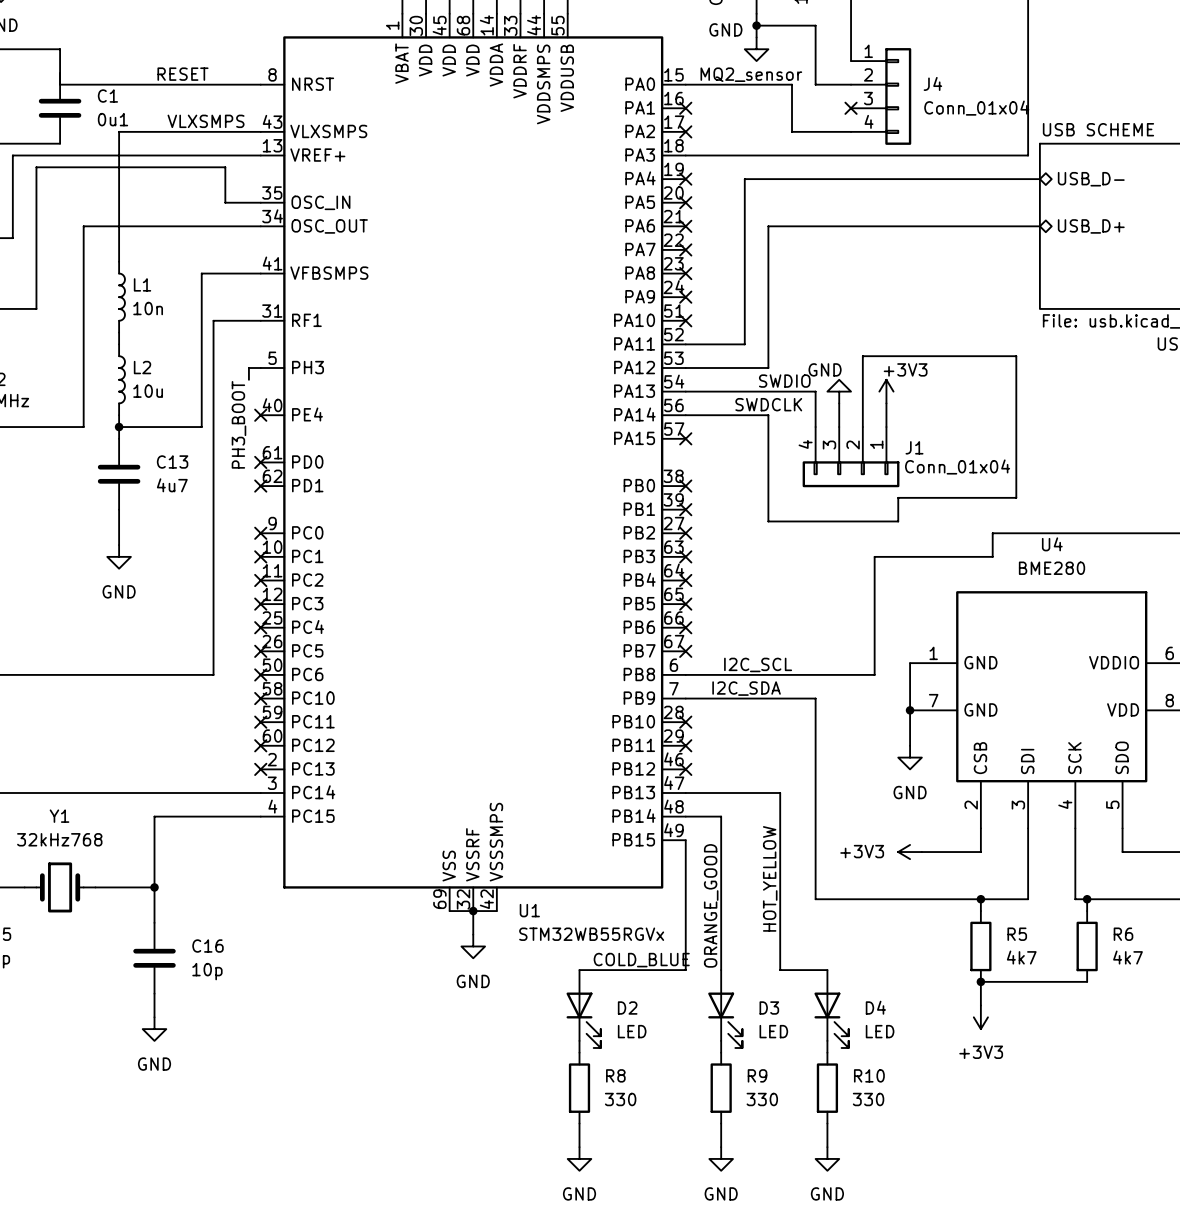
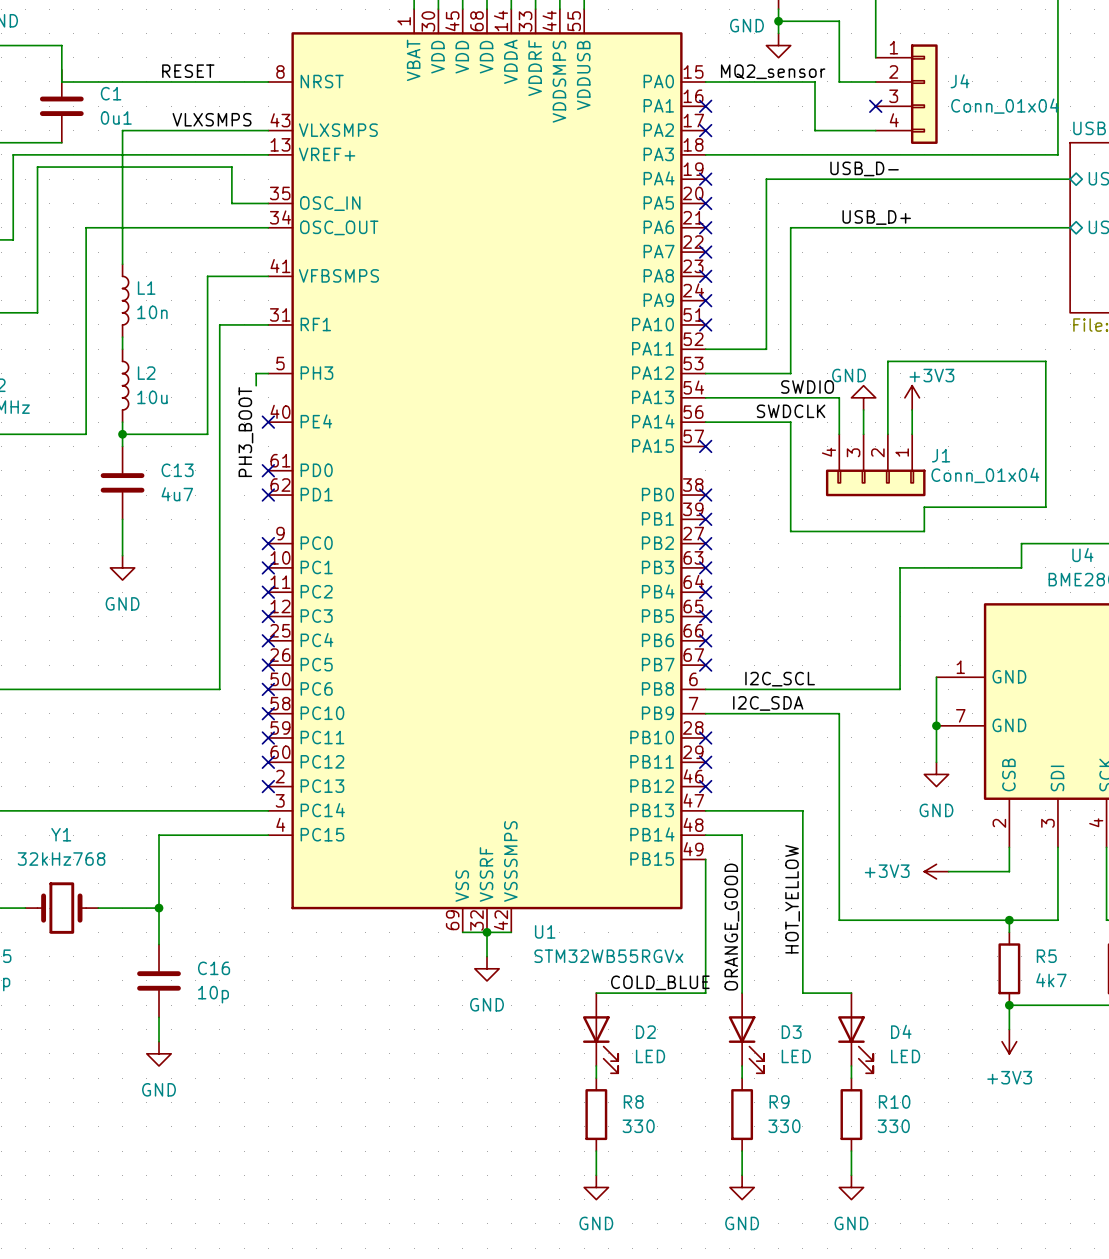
label: none -> USB_D- (864, 168)
label: none -> USB_D+ (876, 217)

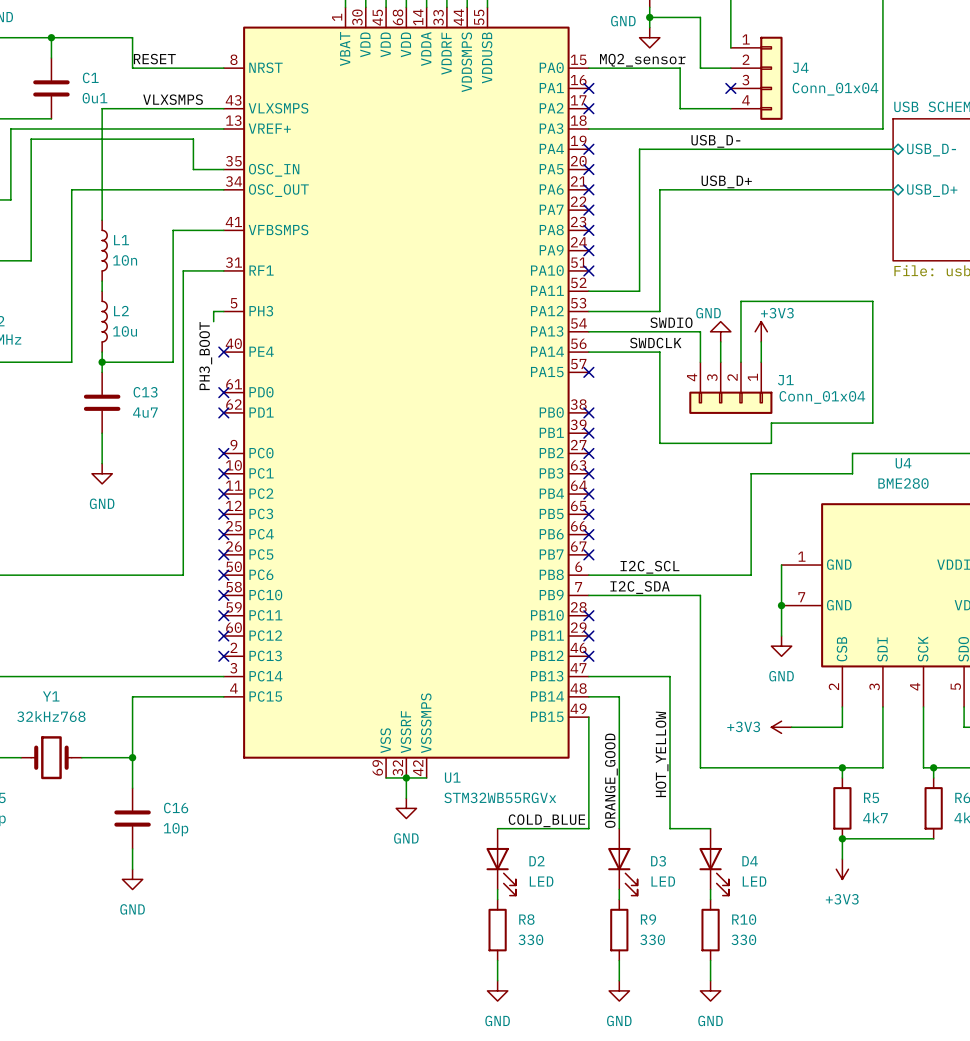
junction: none -> (51, 37)
wire: (61, 69) (61, 81) (159, 81) -> (51, 37) (132, 37) (132, 68)

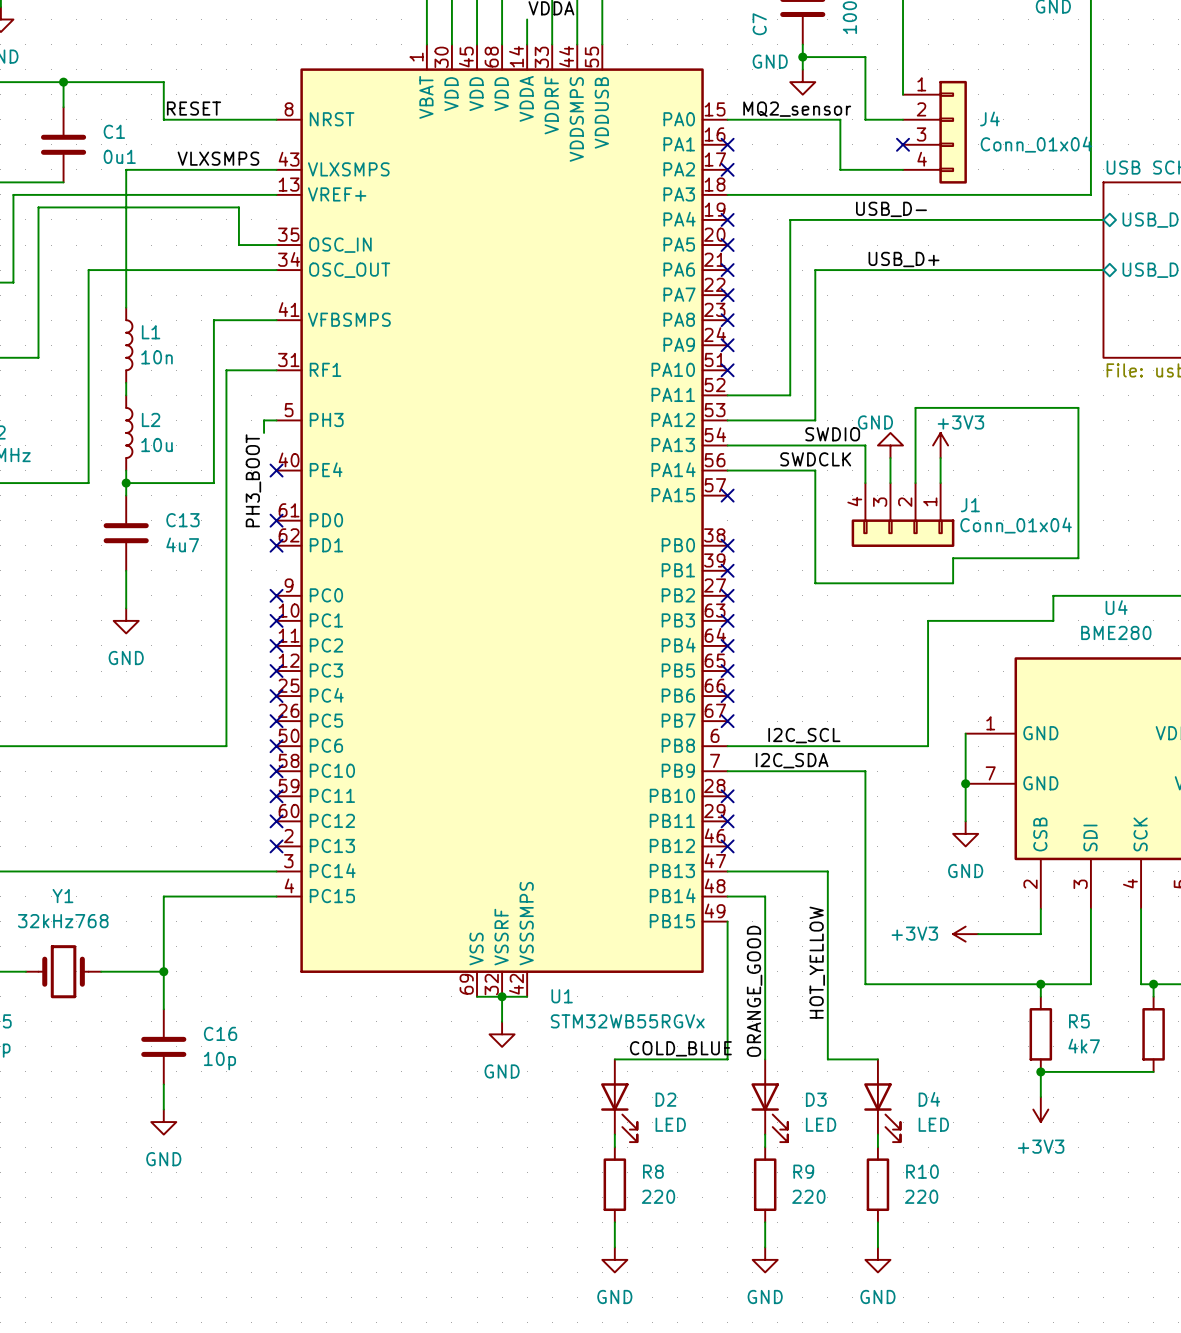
R8 value: 330 (530, 939) -> 220 (658, 1196)
R9 value: 330 (652, 939) -> 220 (808, 1196)
R10 value: 330 (743, 939) -> 220 (921, 1196)

